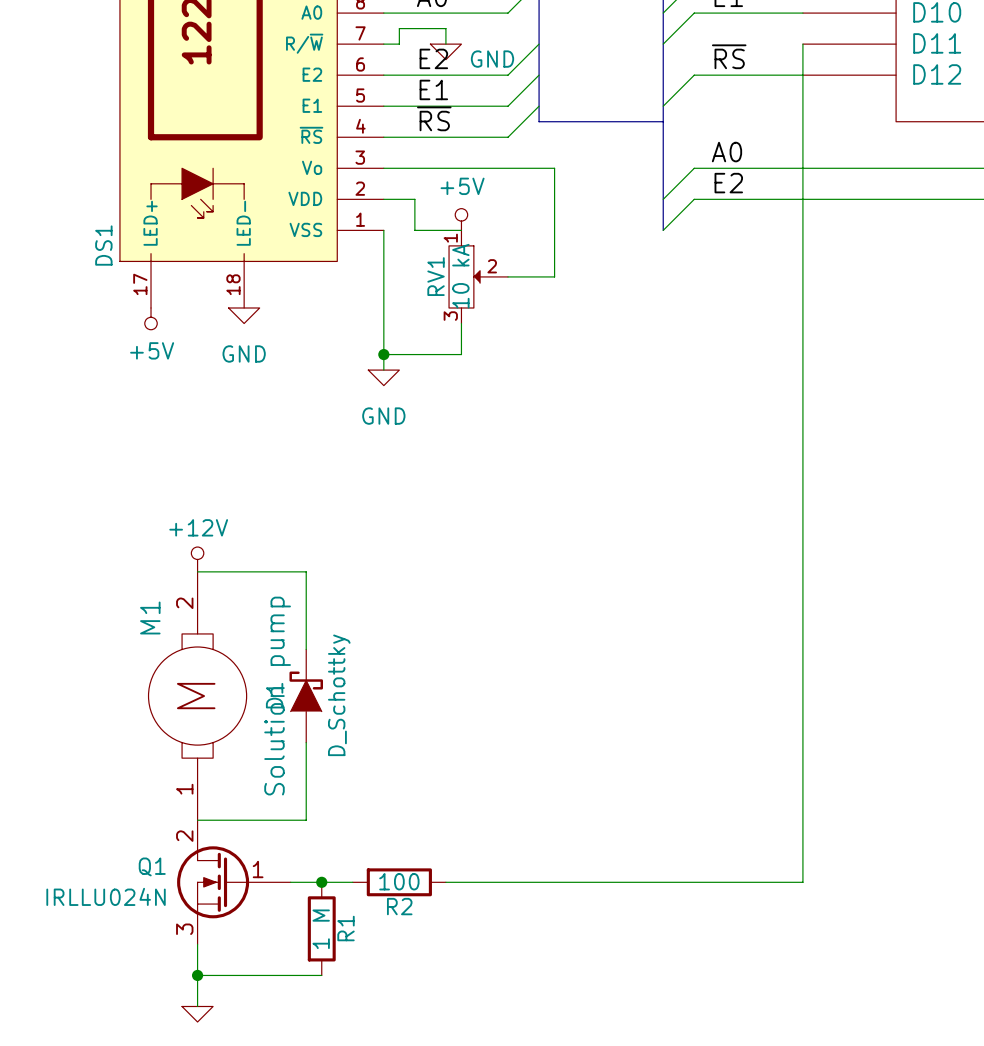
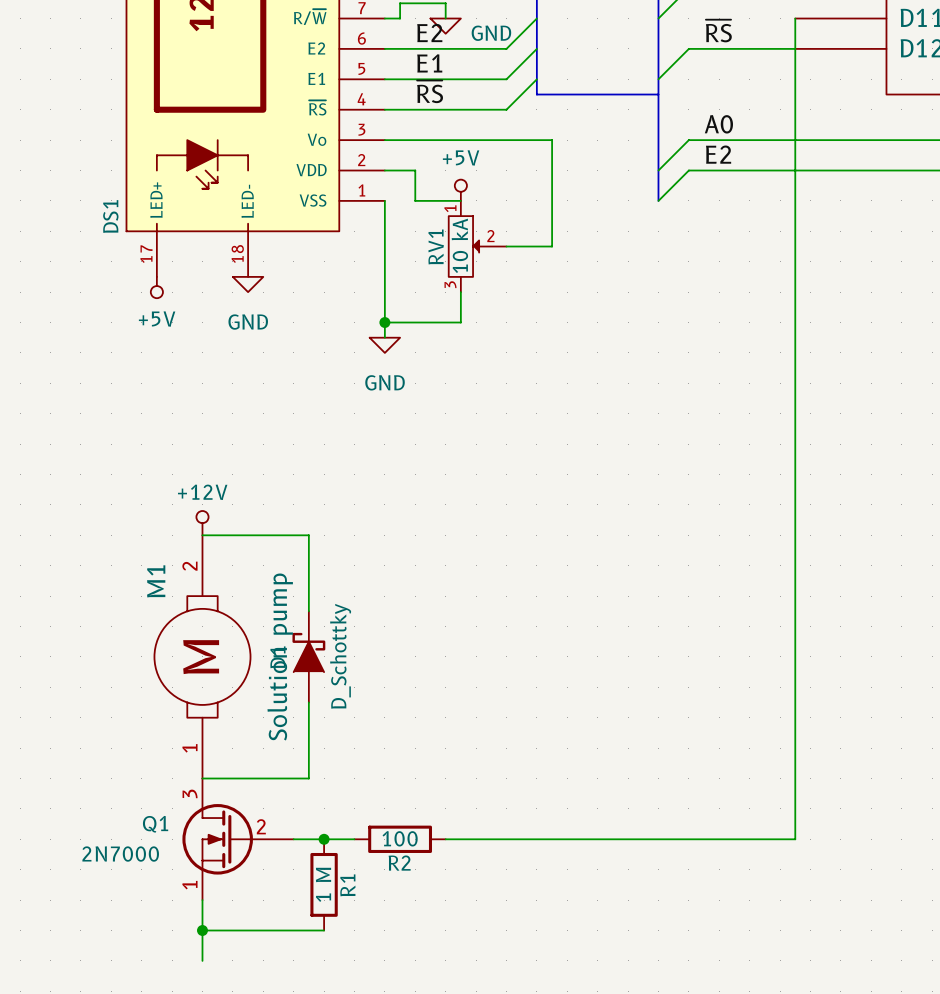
Q1 pin number: 2 (184, 836) -> 3 (190, 793)
Q1 pin number: 1 (258, 869) -> 2 (261, 826)
Q1 value: IRLLU024N (106, 896) -> 2N7000 (120, 854)
Q1 pin number: 3 (184, 929) -> 1 (189, 885)
power symbol: (197, 1014) -> none

